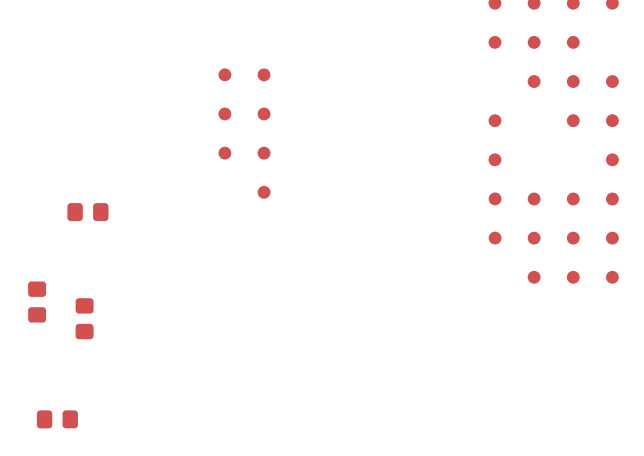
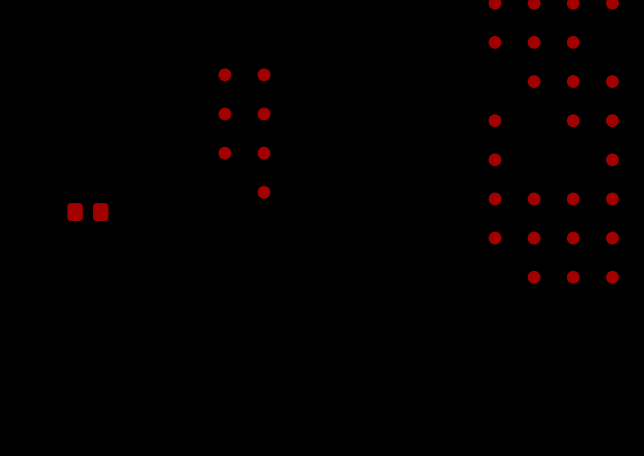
part: (37, 302) -> none
part: (84, 318) -> none
part: (57, 419) -> none

